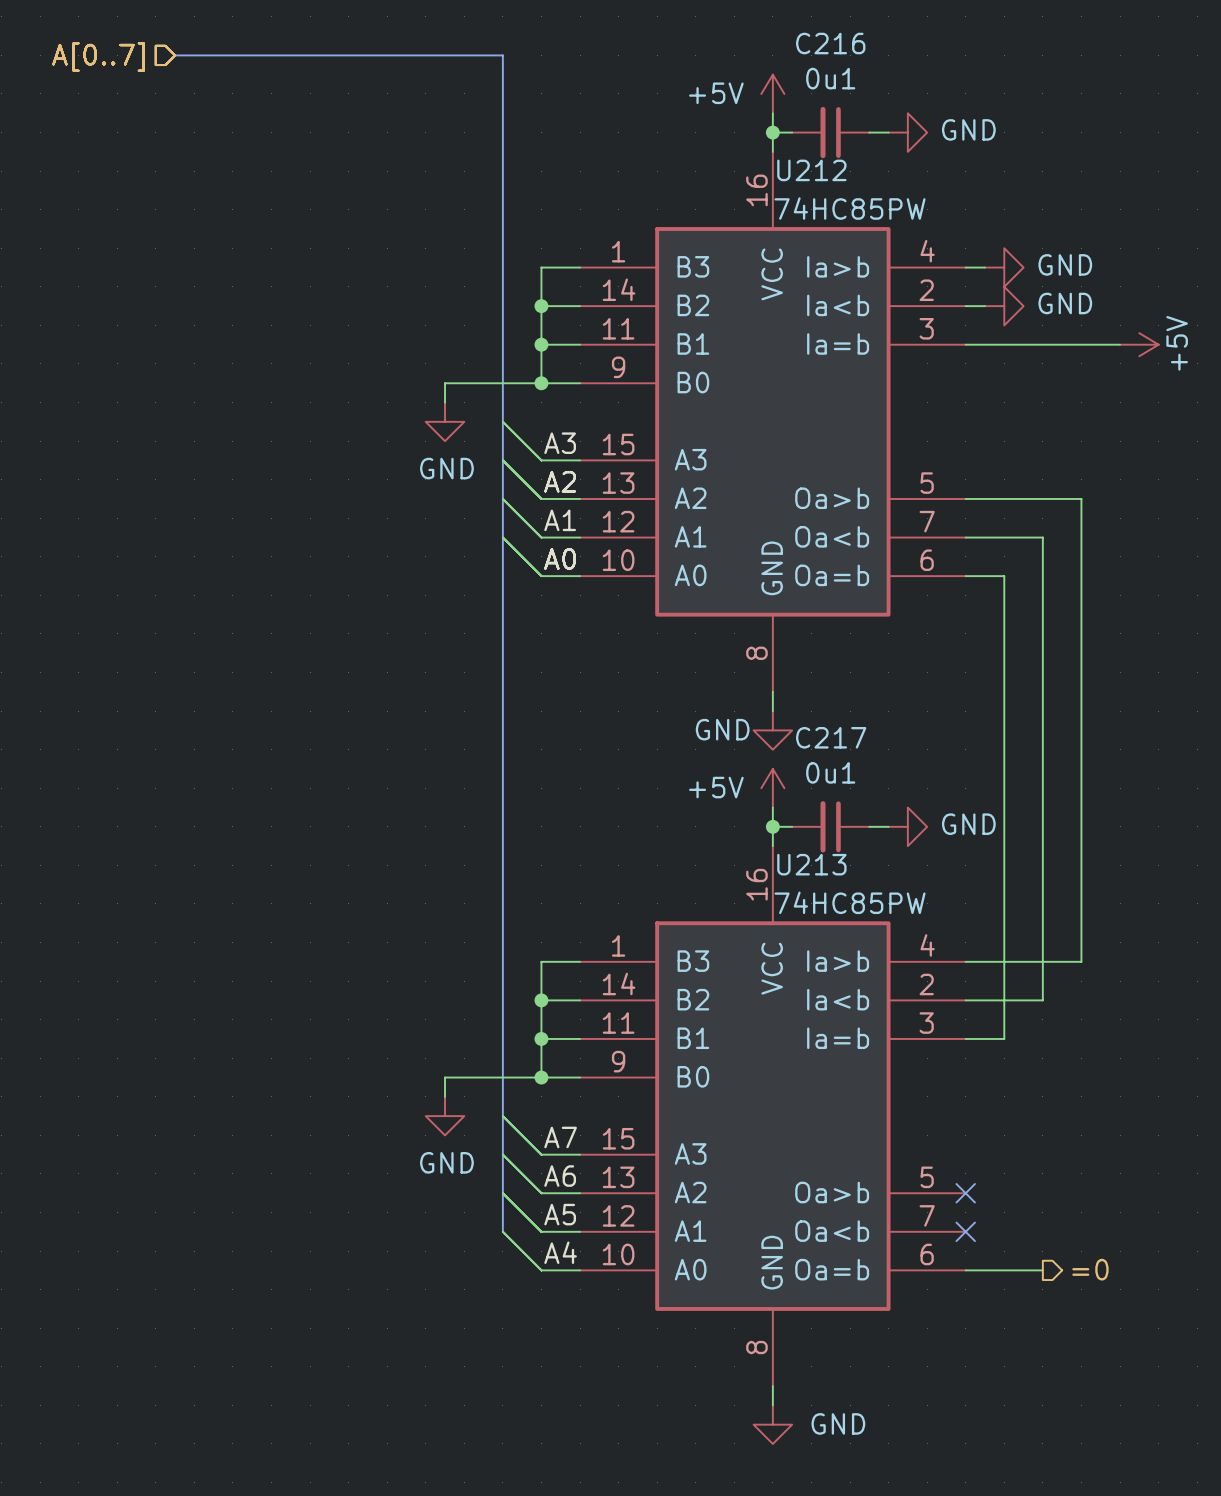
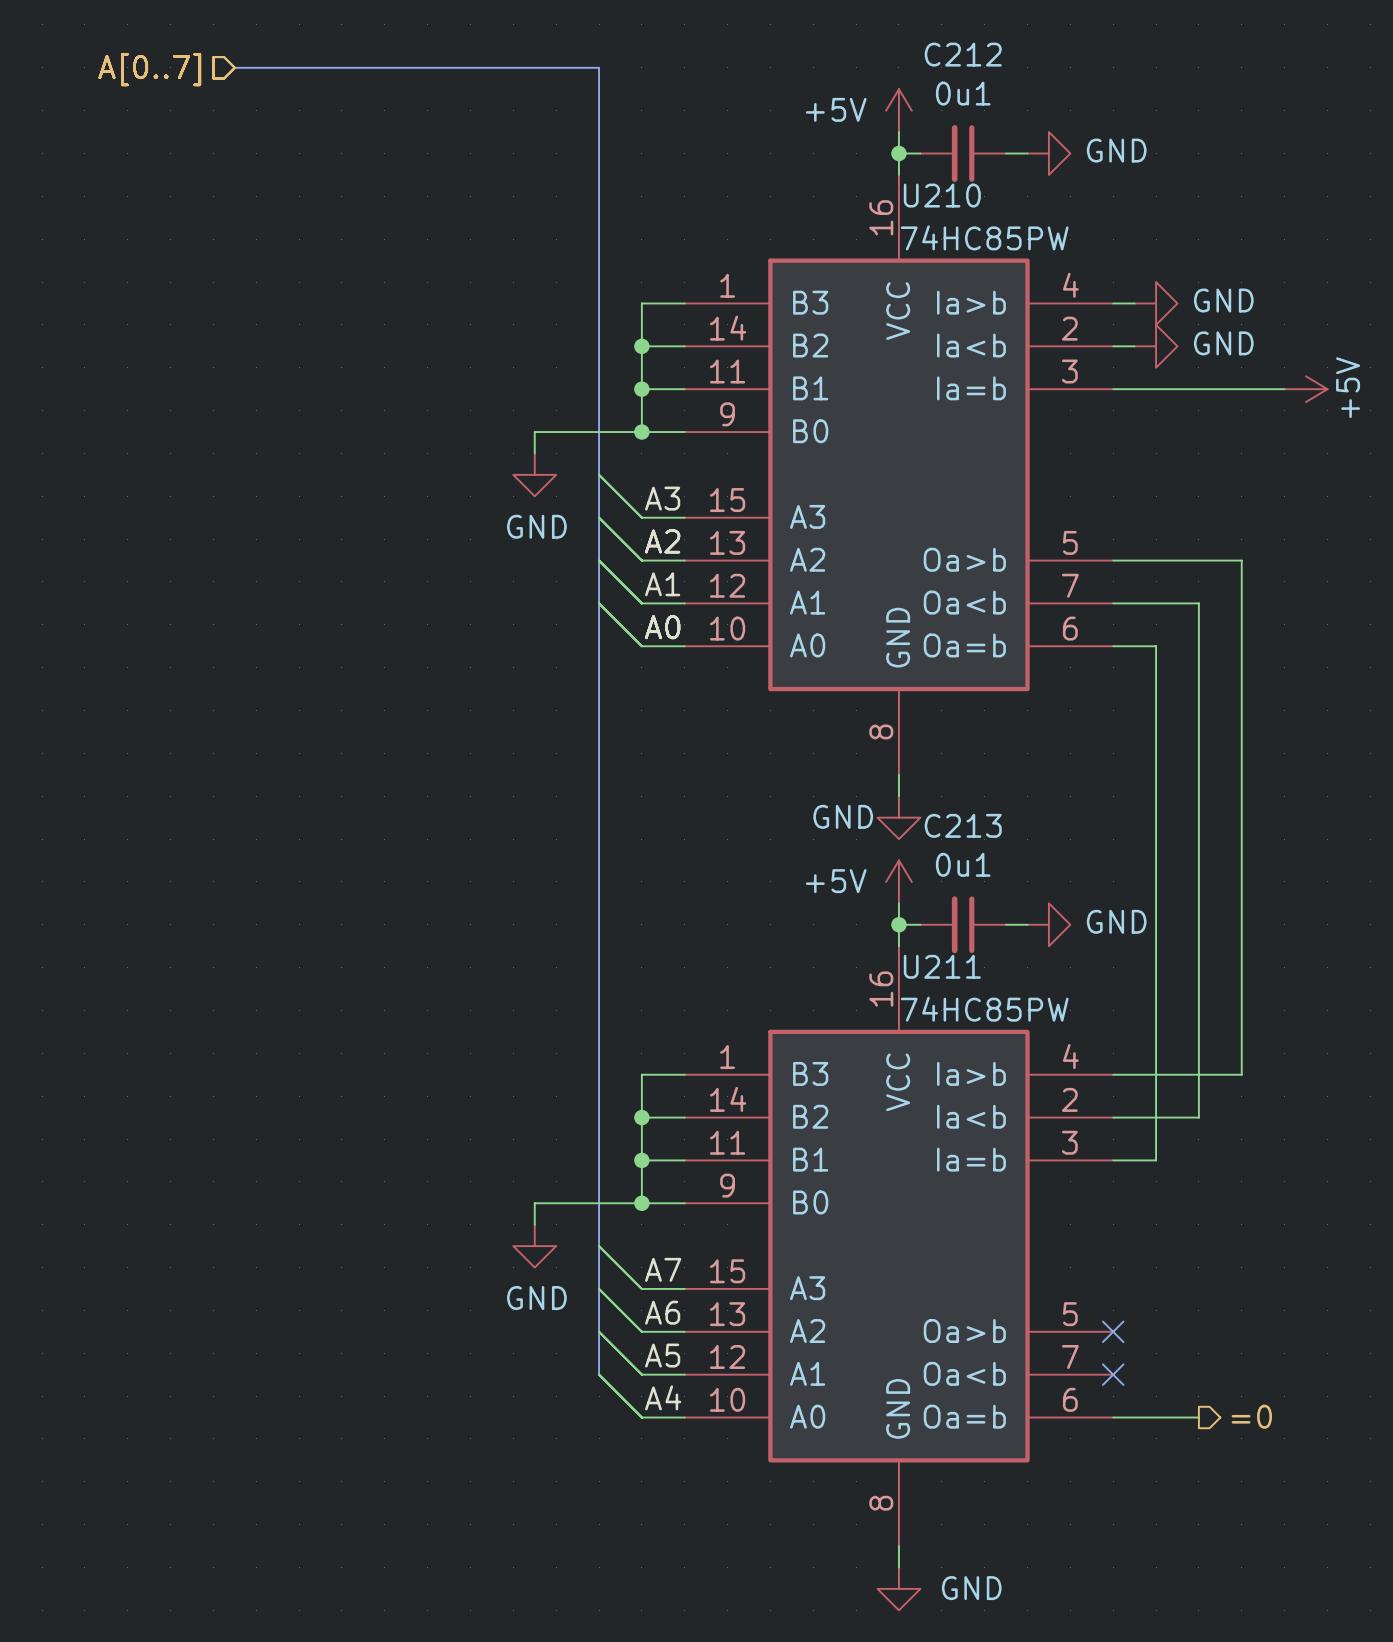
C216 name: C216 (830, 43) -> C212 (963, 54)
U212 name: U212 (811, 170) -> U210 (942, 195)
C217 name: C217 (831, 737) -> C213 (963, 825)
U213 name: U213 (811, 864) -> U211 (942, 966)

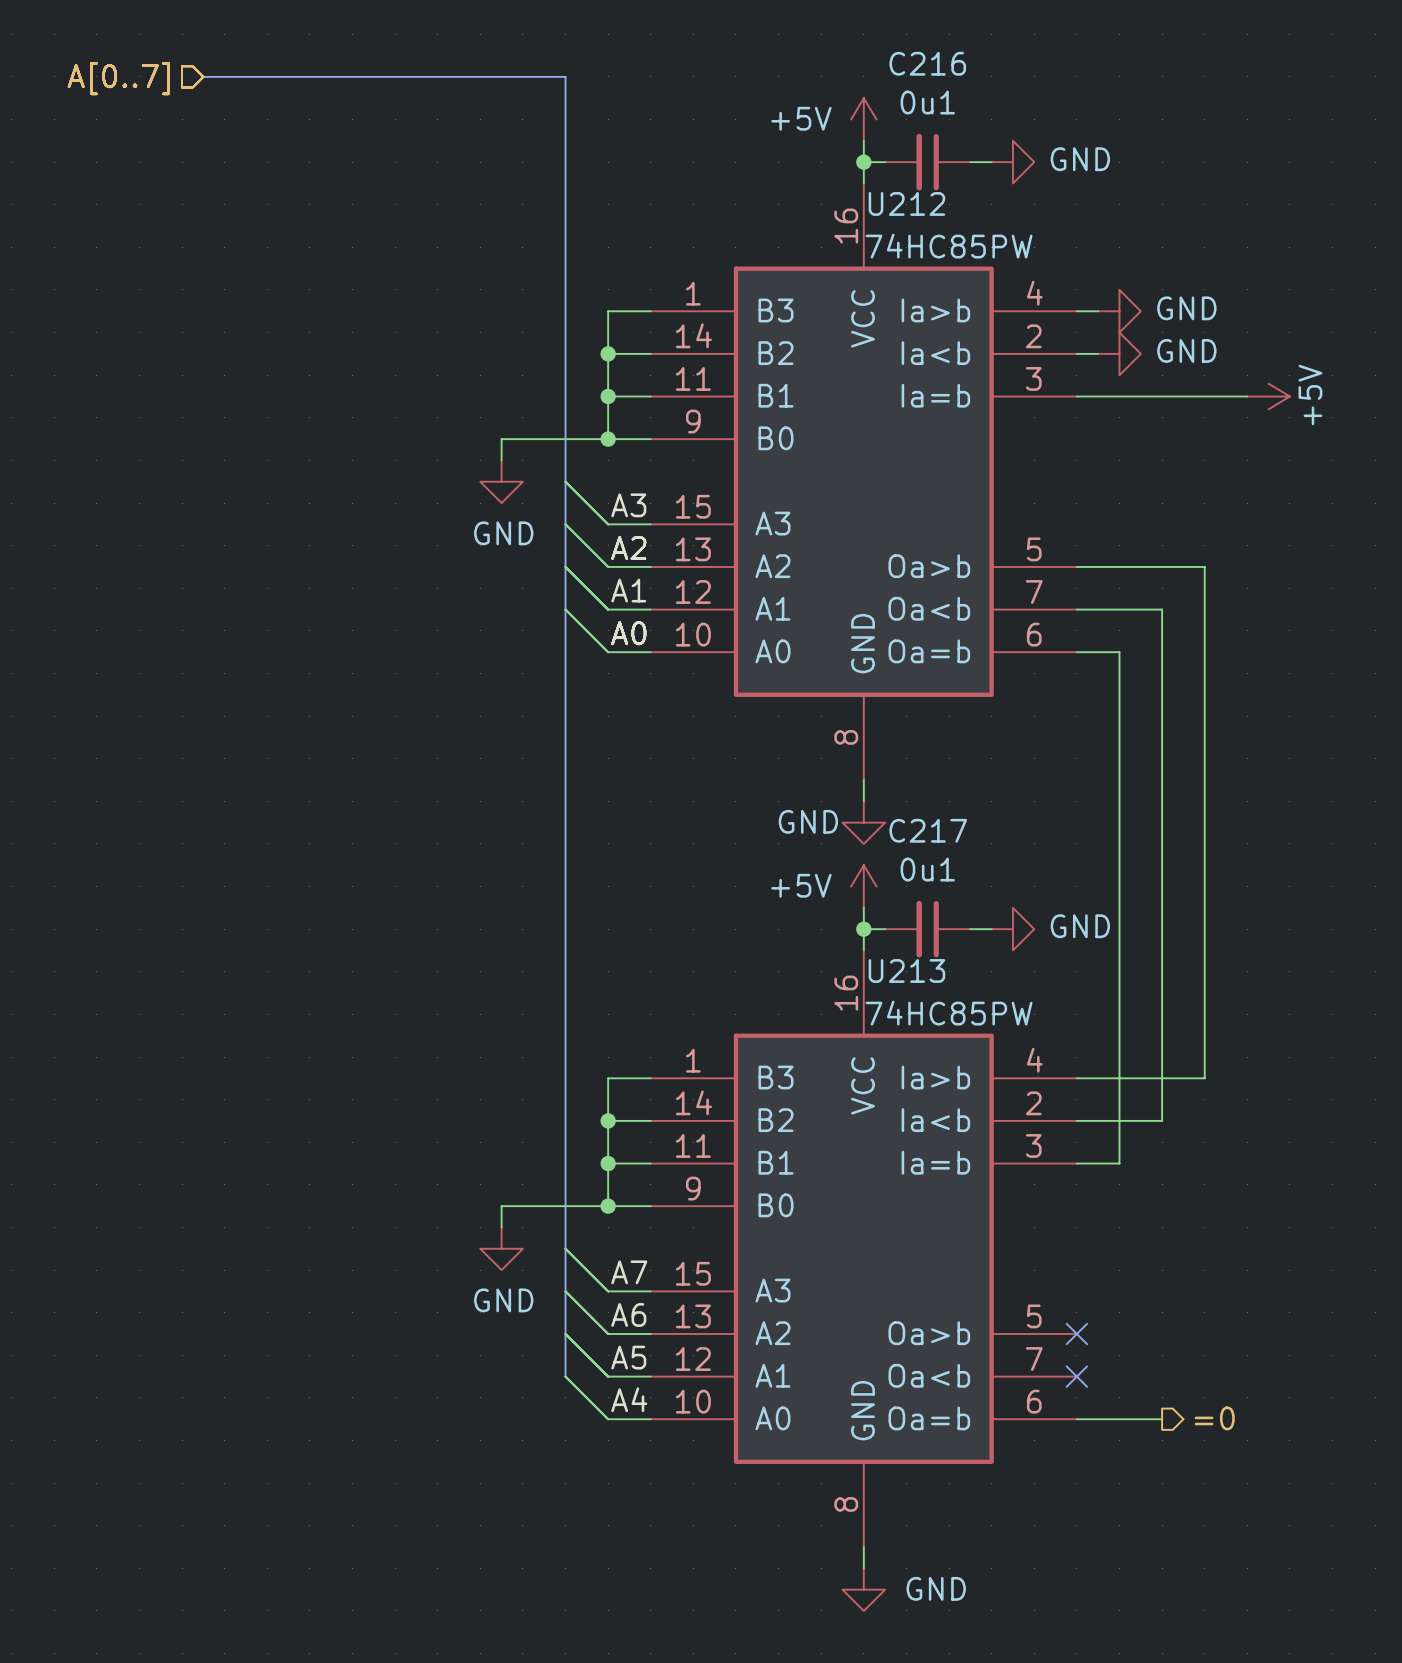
C212 name: C212 (963, 54) -> C216 (927, 63)
U210 name: U210 (942, 195) -> U212 (906, 203)
C213 name: C213 (963, 825) -> C217 (928, 830)
U211 name: U211 (942, 966) -> U213 (906, 970)

